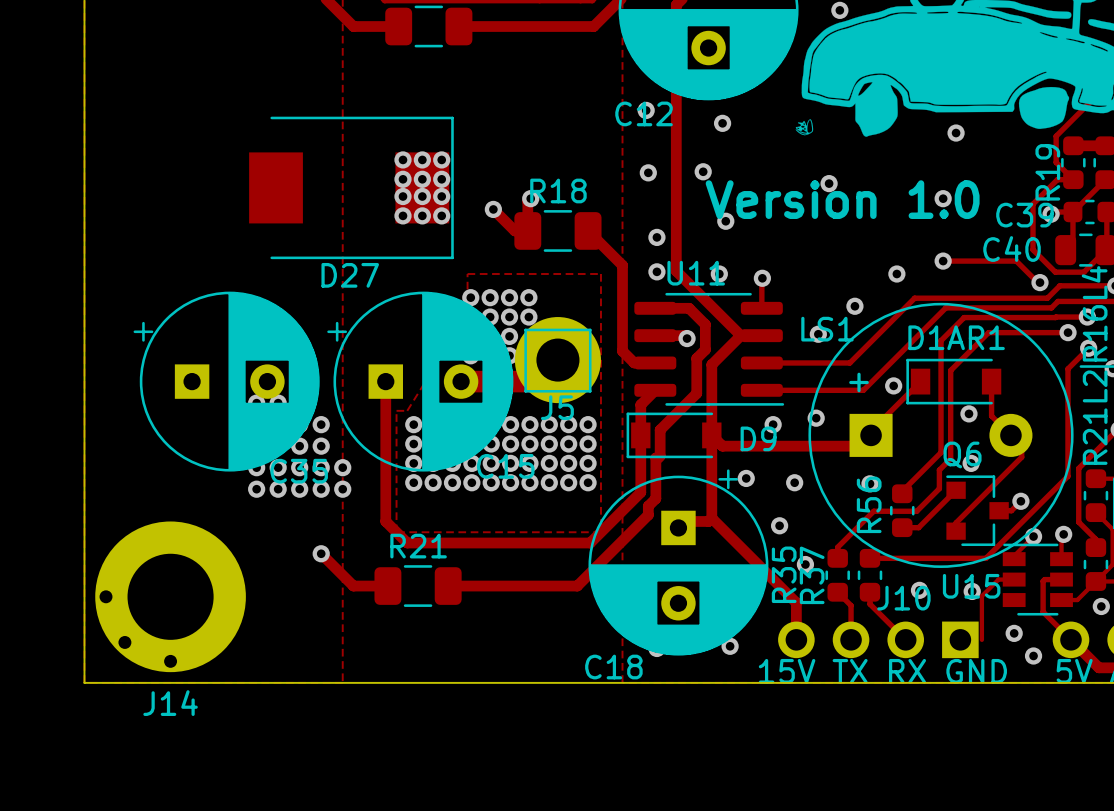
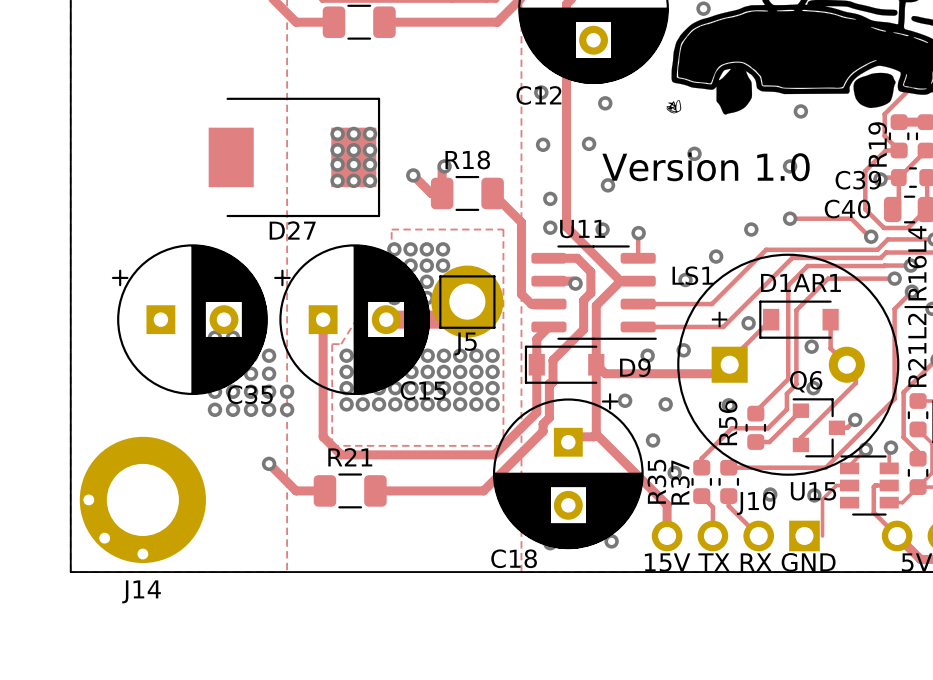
via: (1101, 606) -> none
via: (1014, 633) -> none
via: (1033, 655) -> none

